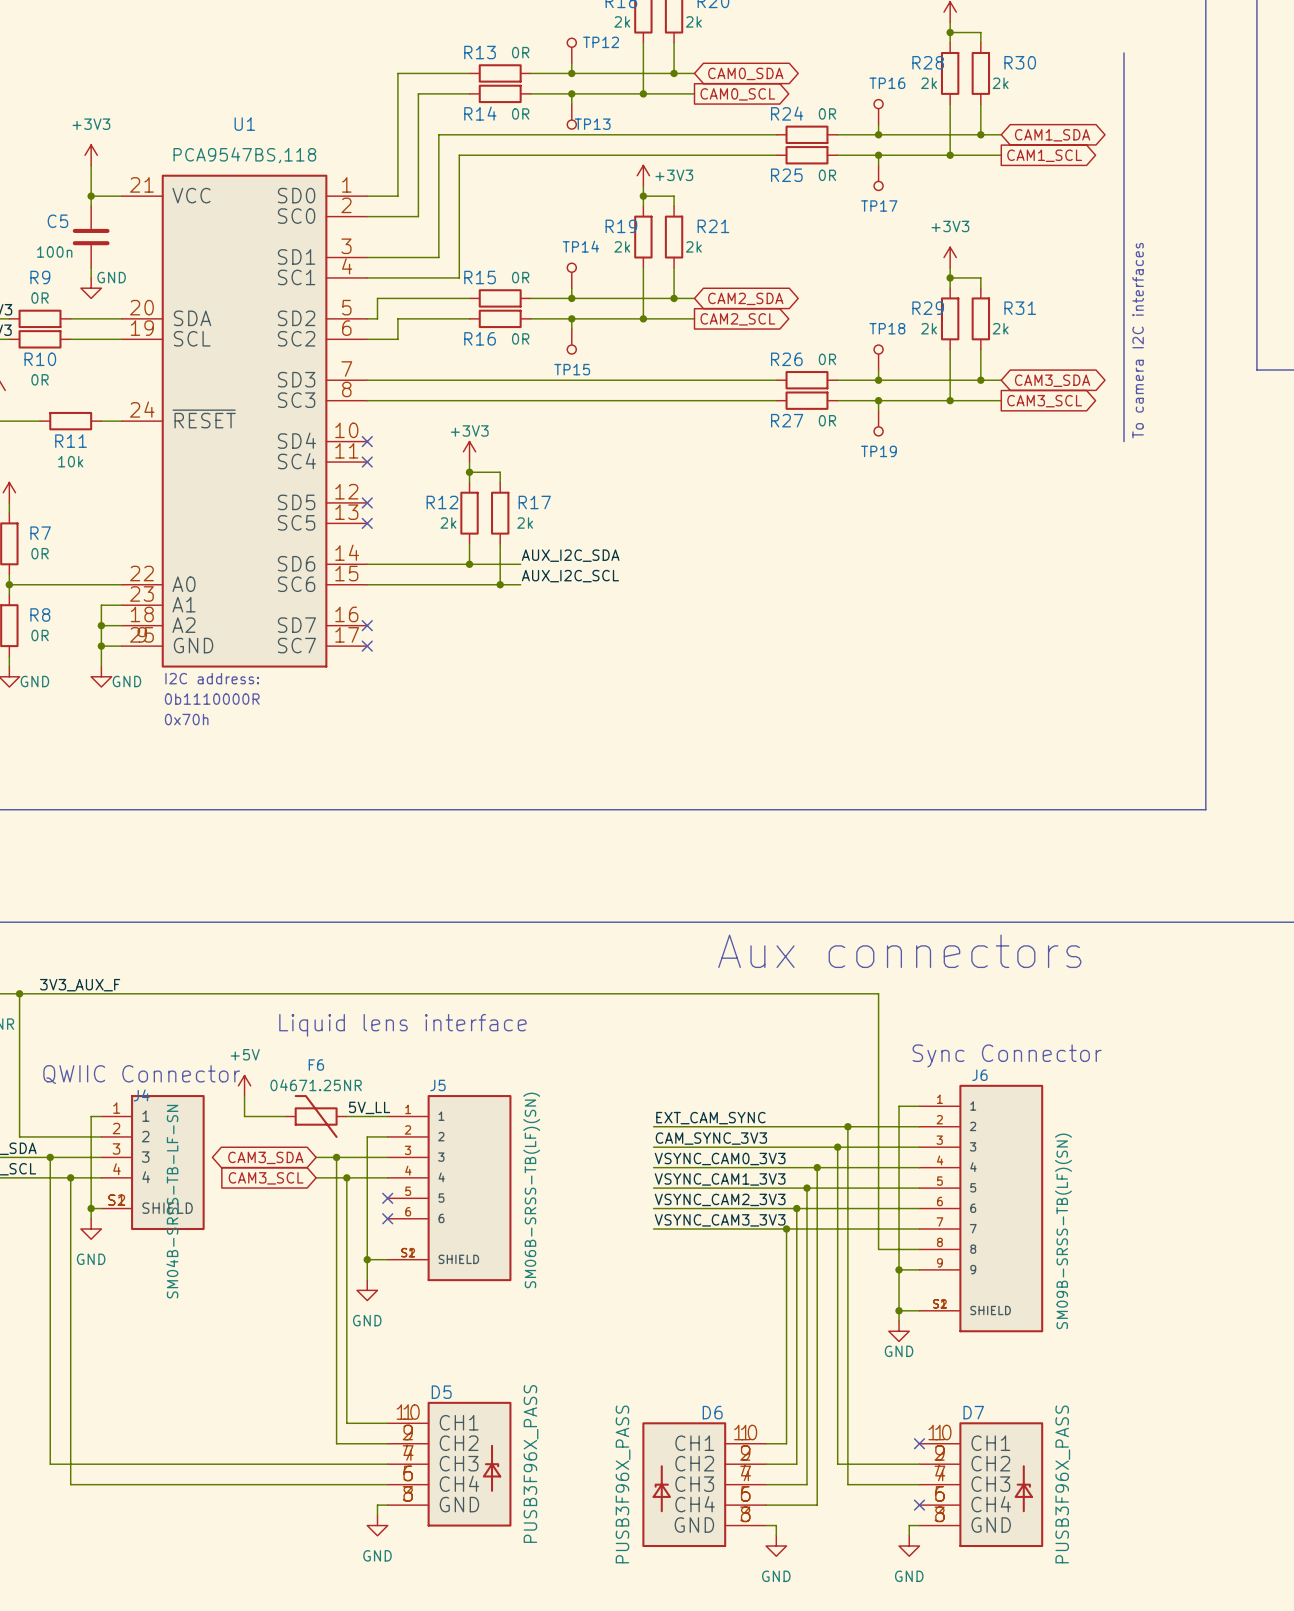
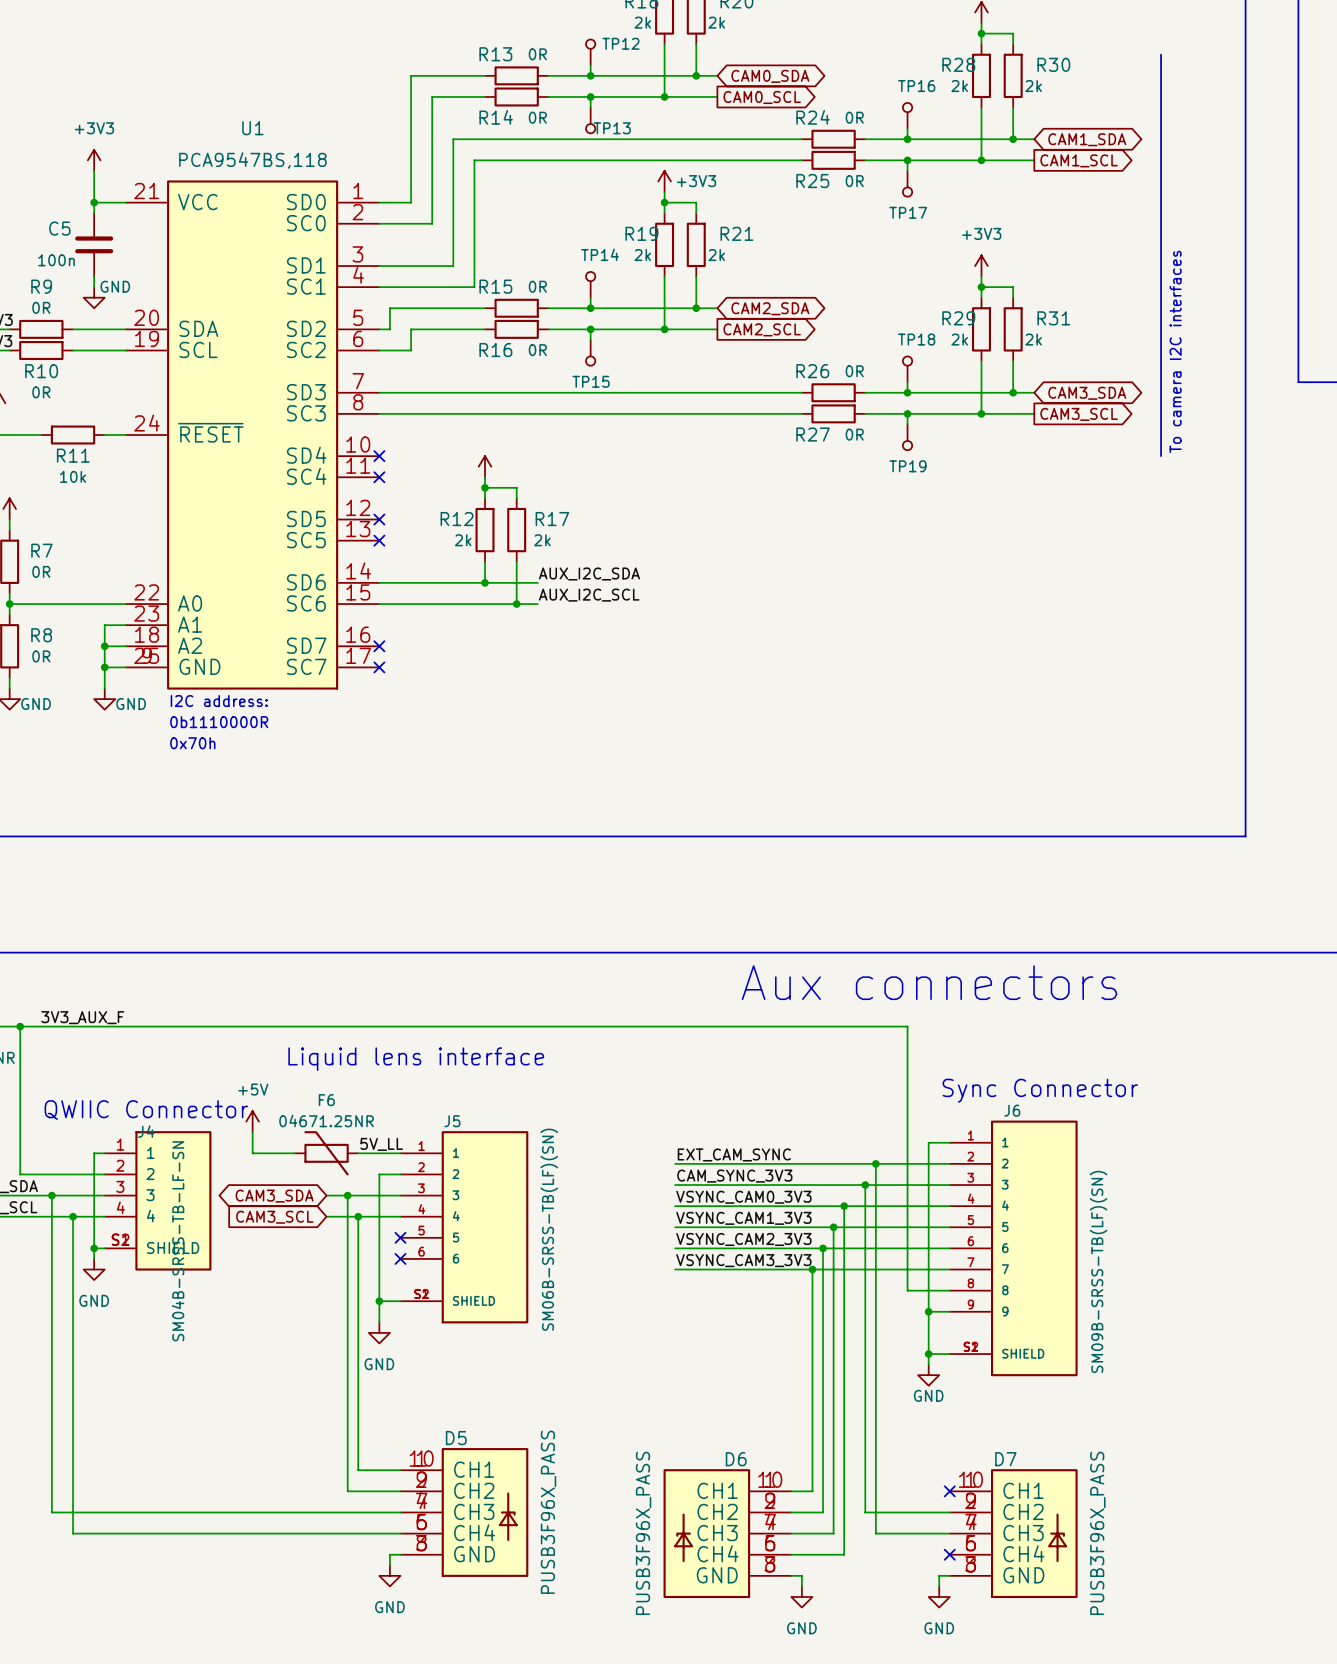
power symbol text: +3V3 (469, 430) -> none

